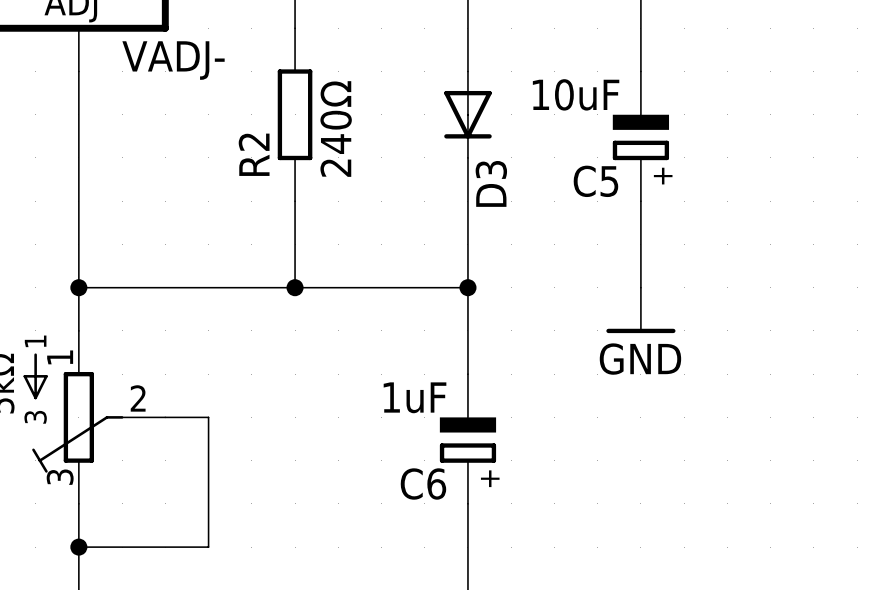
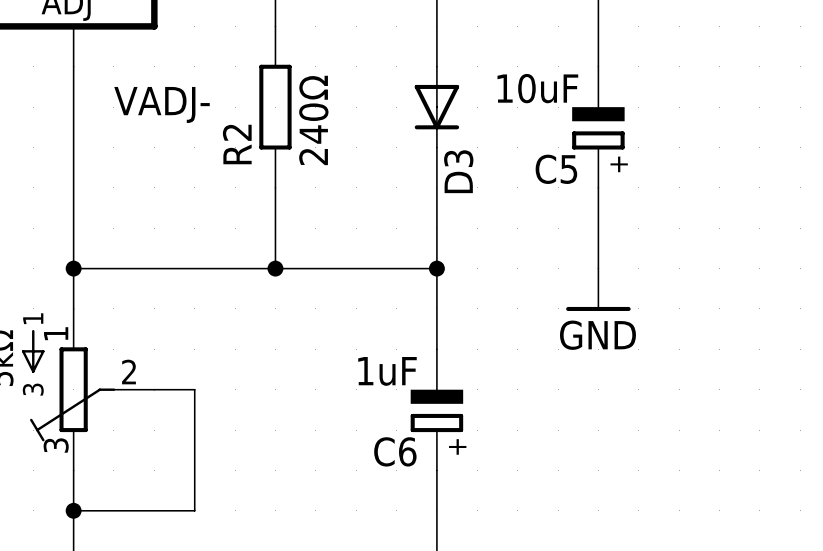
VADJ- name position: VADJ- (173, 60) -> VADJ- (162, 104)

